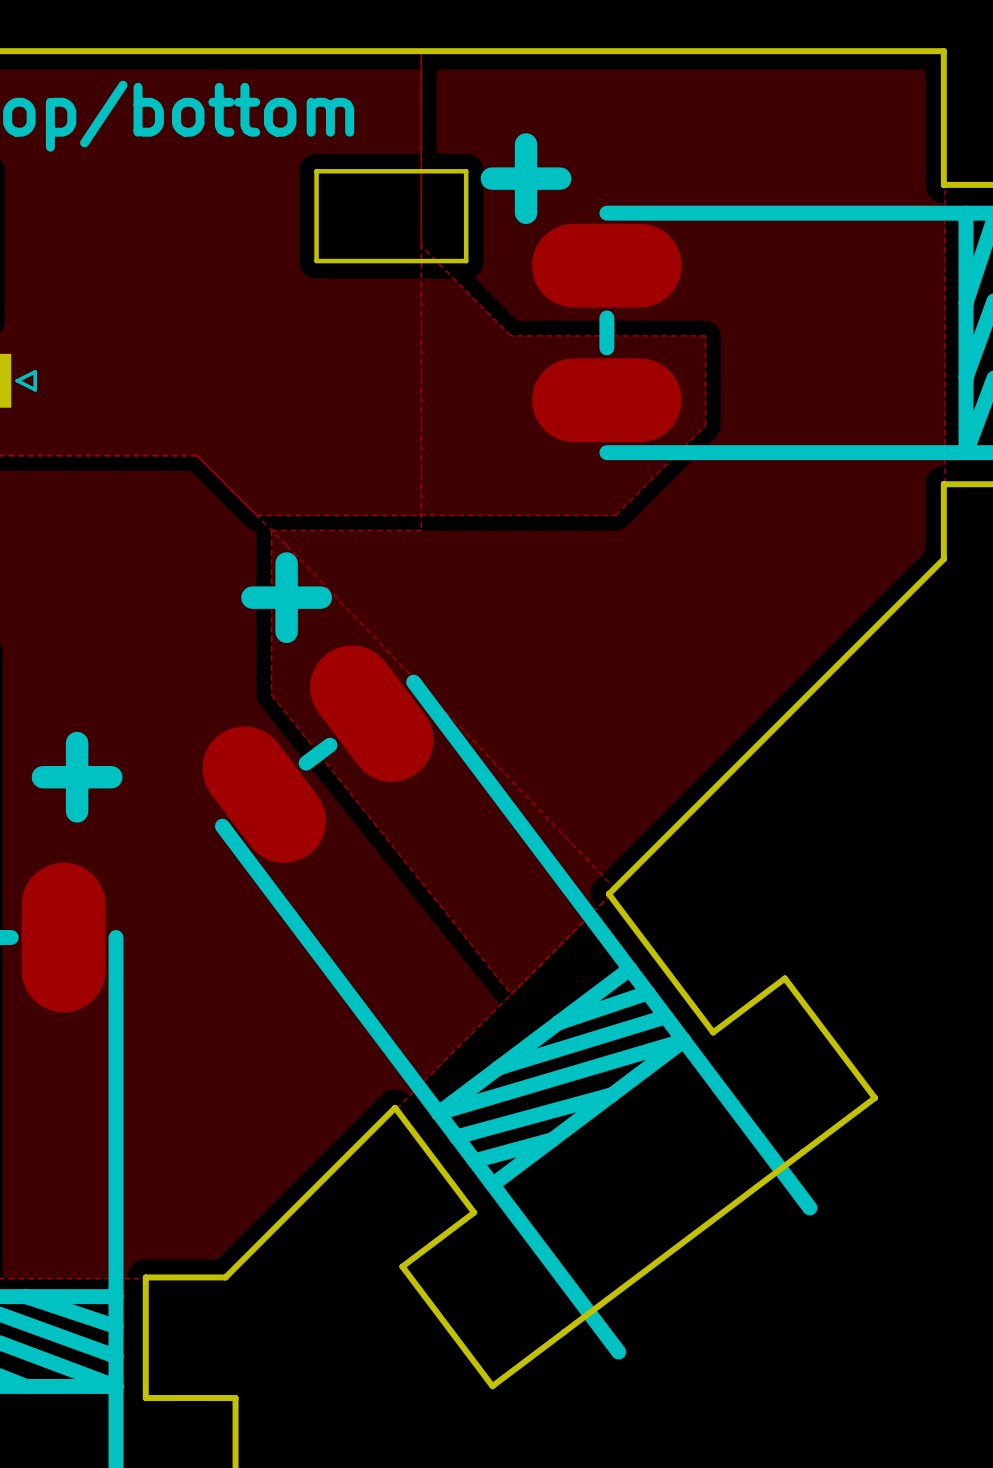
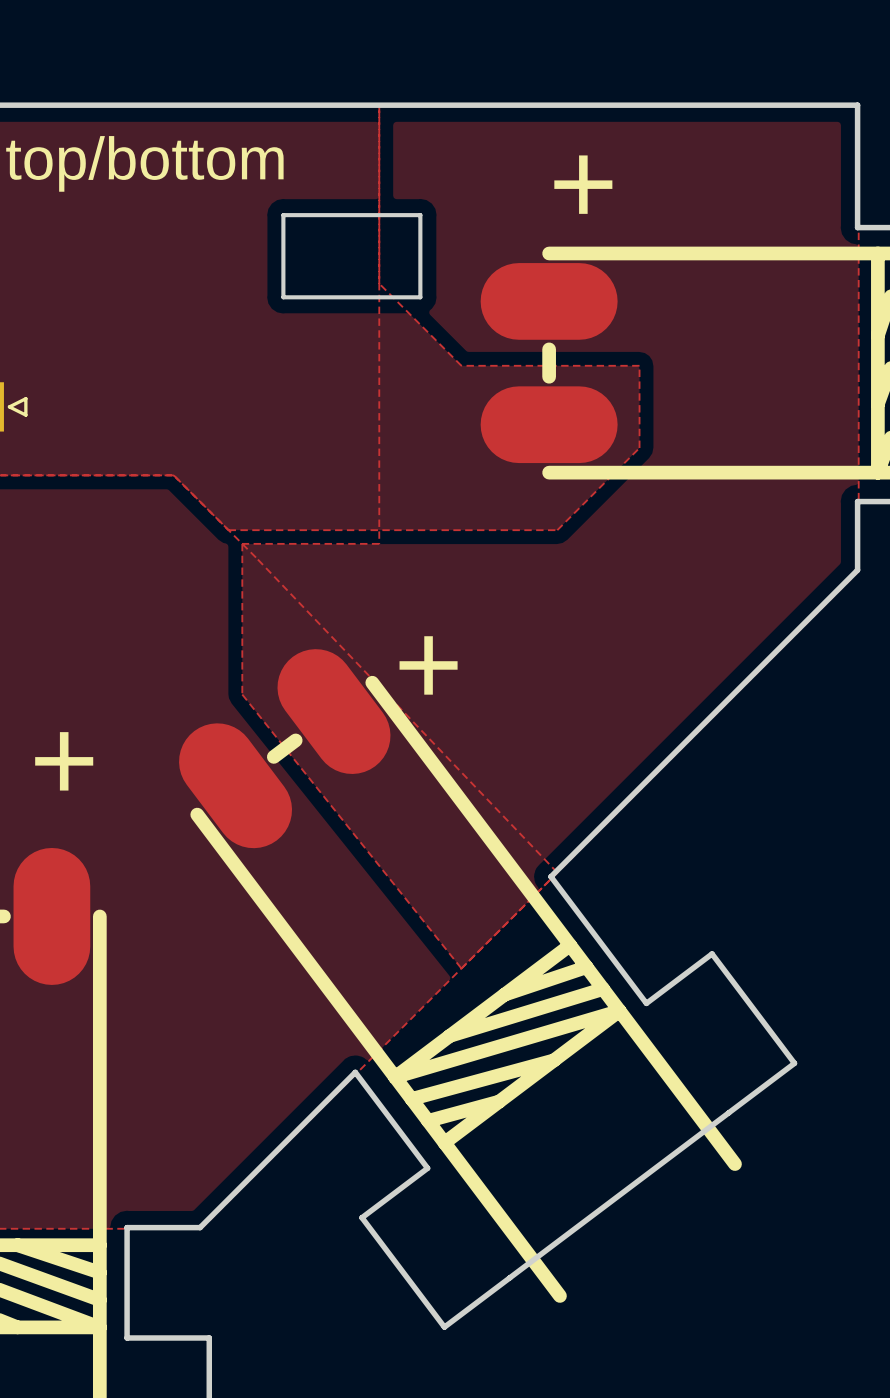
text position: + (526, 178) -> + (583, 184)
text position: + (286, 597) -> + (428, 665)

